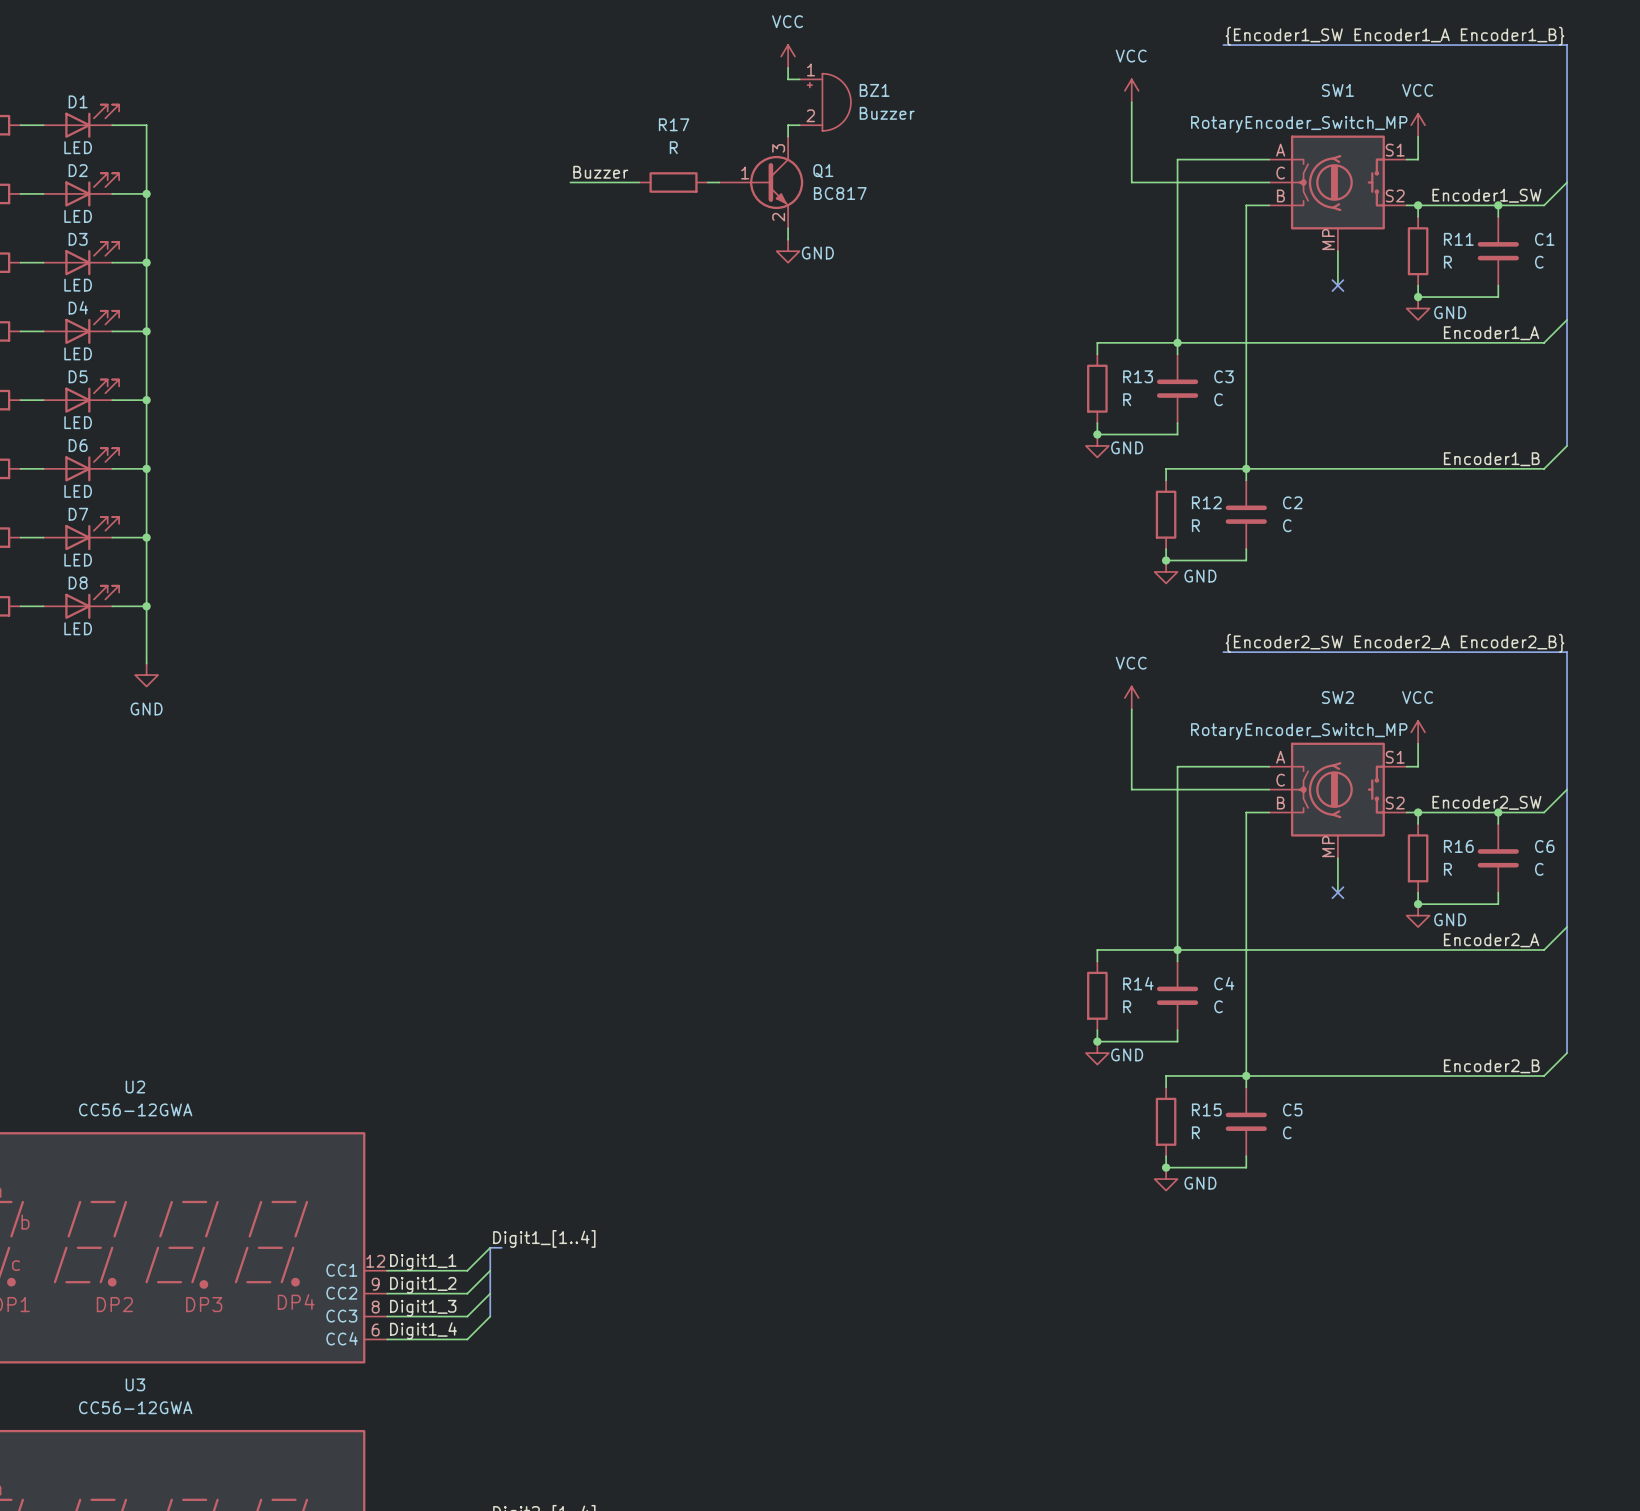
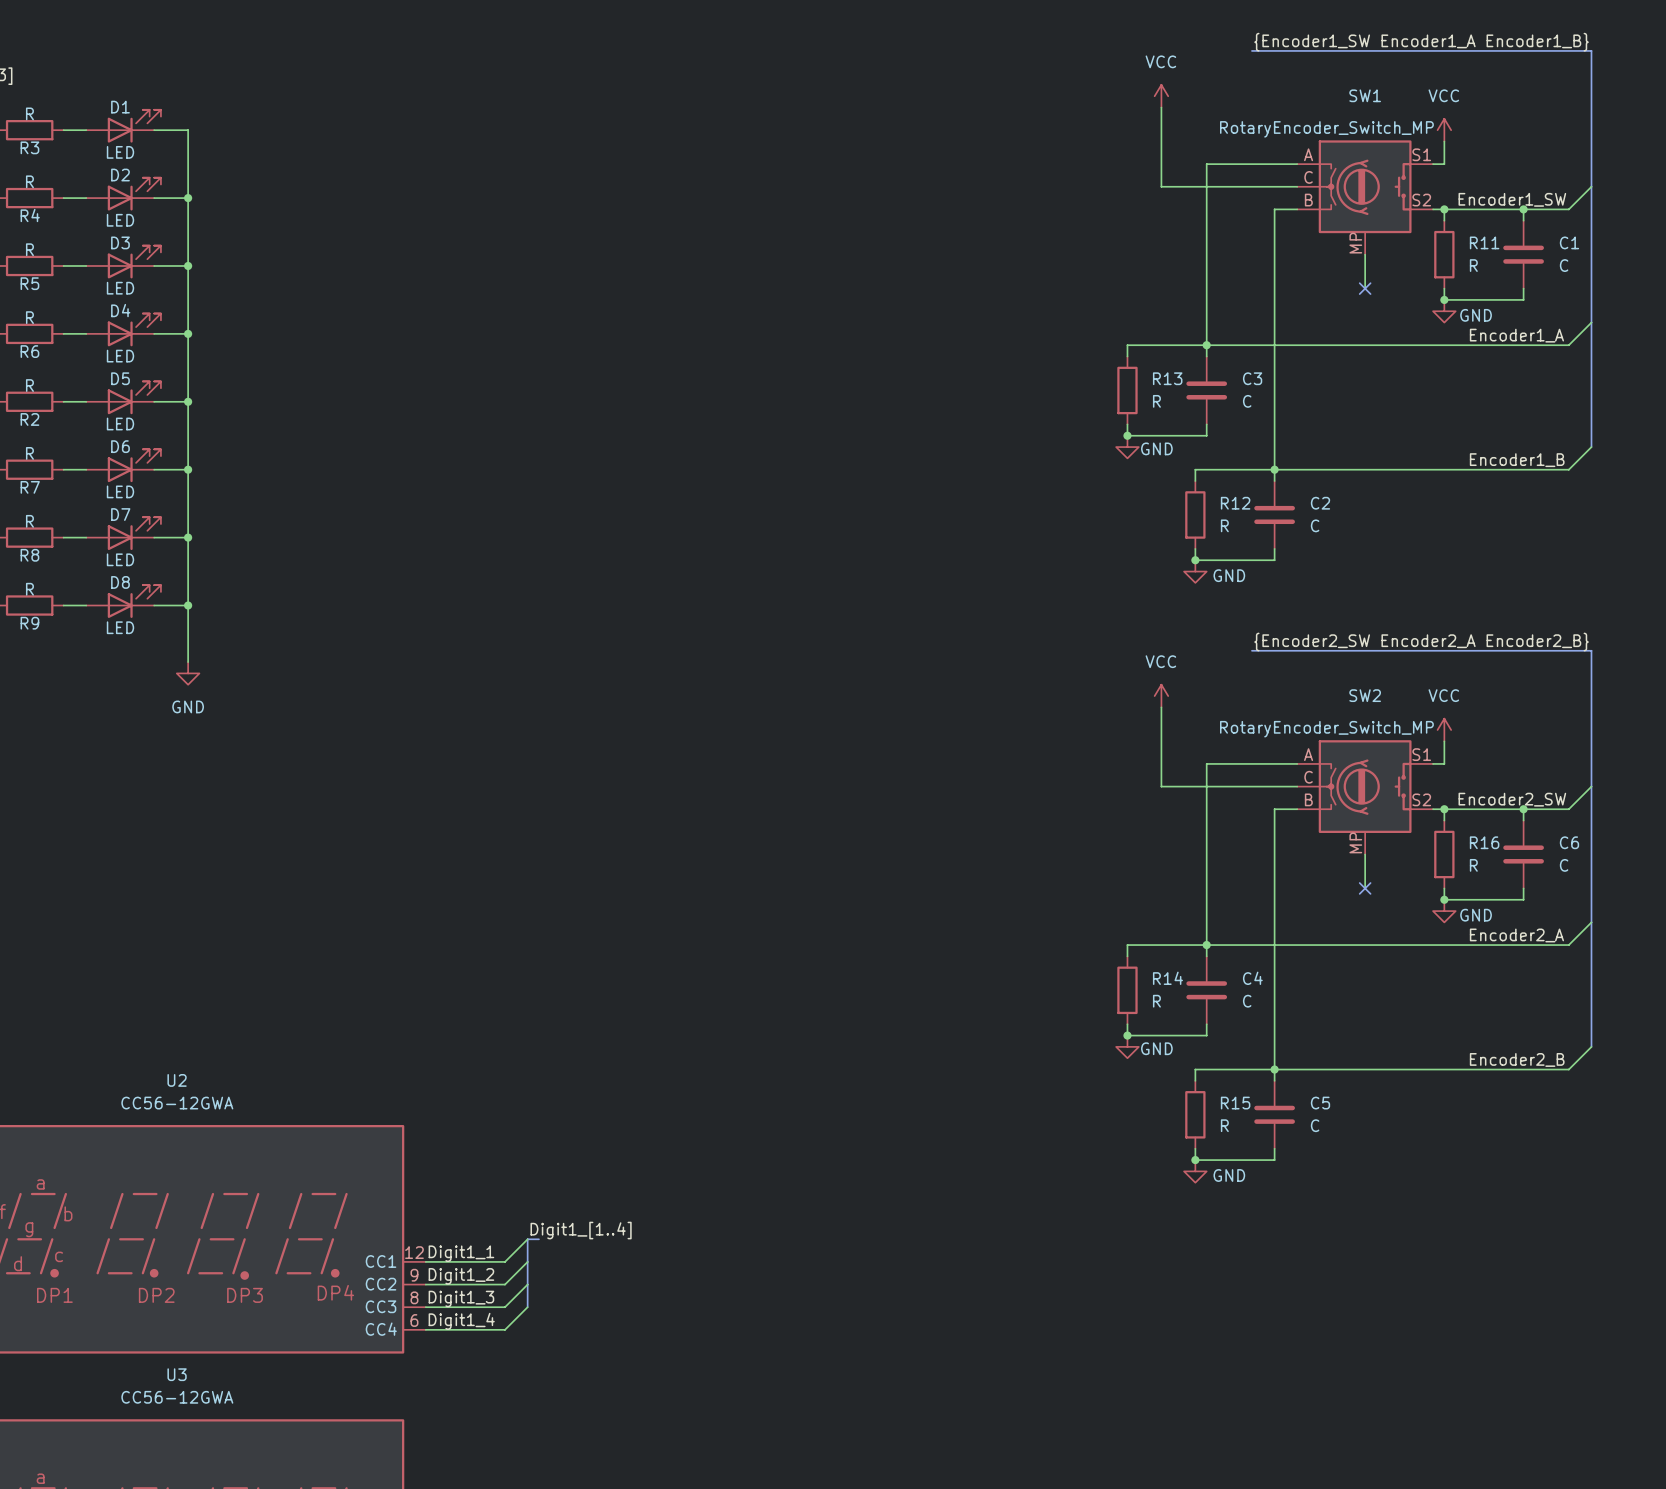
power symbol: VCC (788, 56) -> none
wire: (788, 67) (788, 79) (799, 79) -> none
BZ1: Buzzer (825, 102) -> none
wire: (799, 125) (788, 125) (788, 136) -> none
label: Buzzer (600, 172) -> none
wire: (570, 182) (639, 182) -> none
R17: R (673, 182) -> none
wire: (707, 182) (719, 182) -> none
Q1: BC817 (761, 182) -> none
wire: (788, 228) (788, 239) -> none
power symbol: GND (788, 251) -> none

